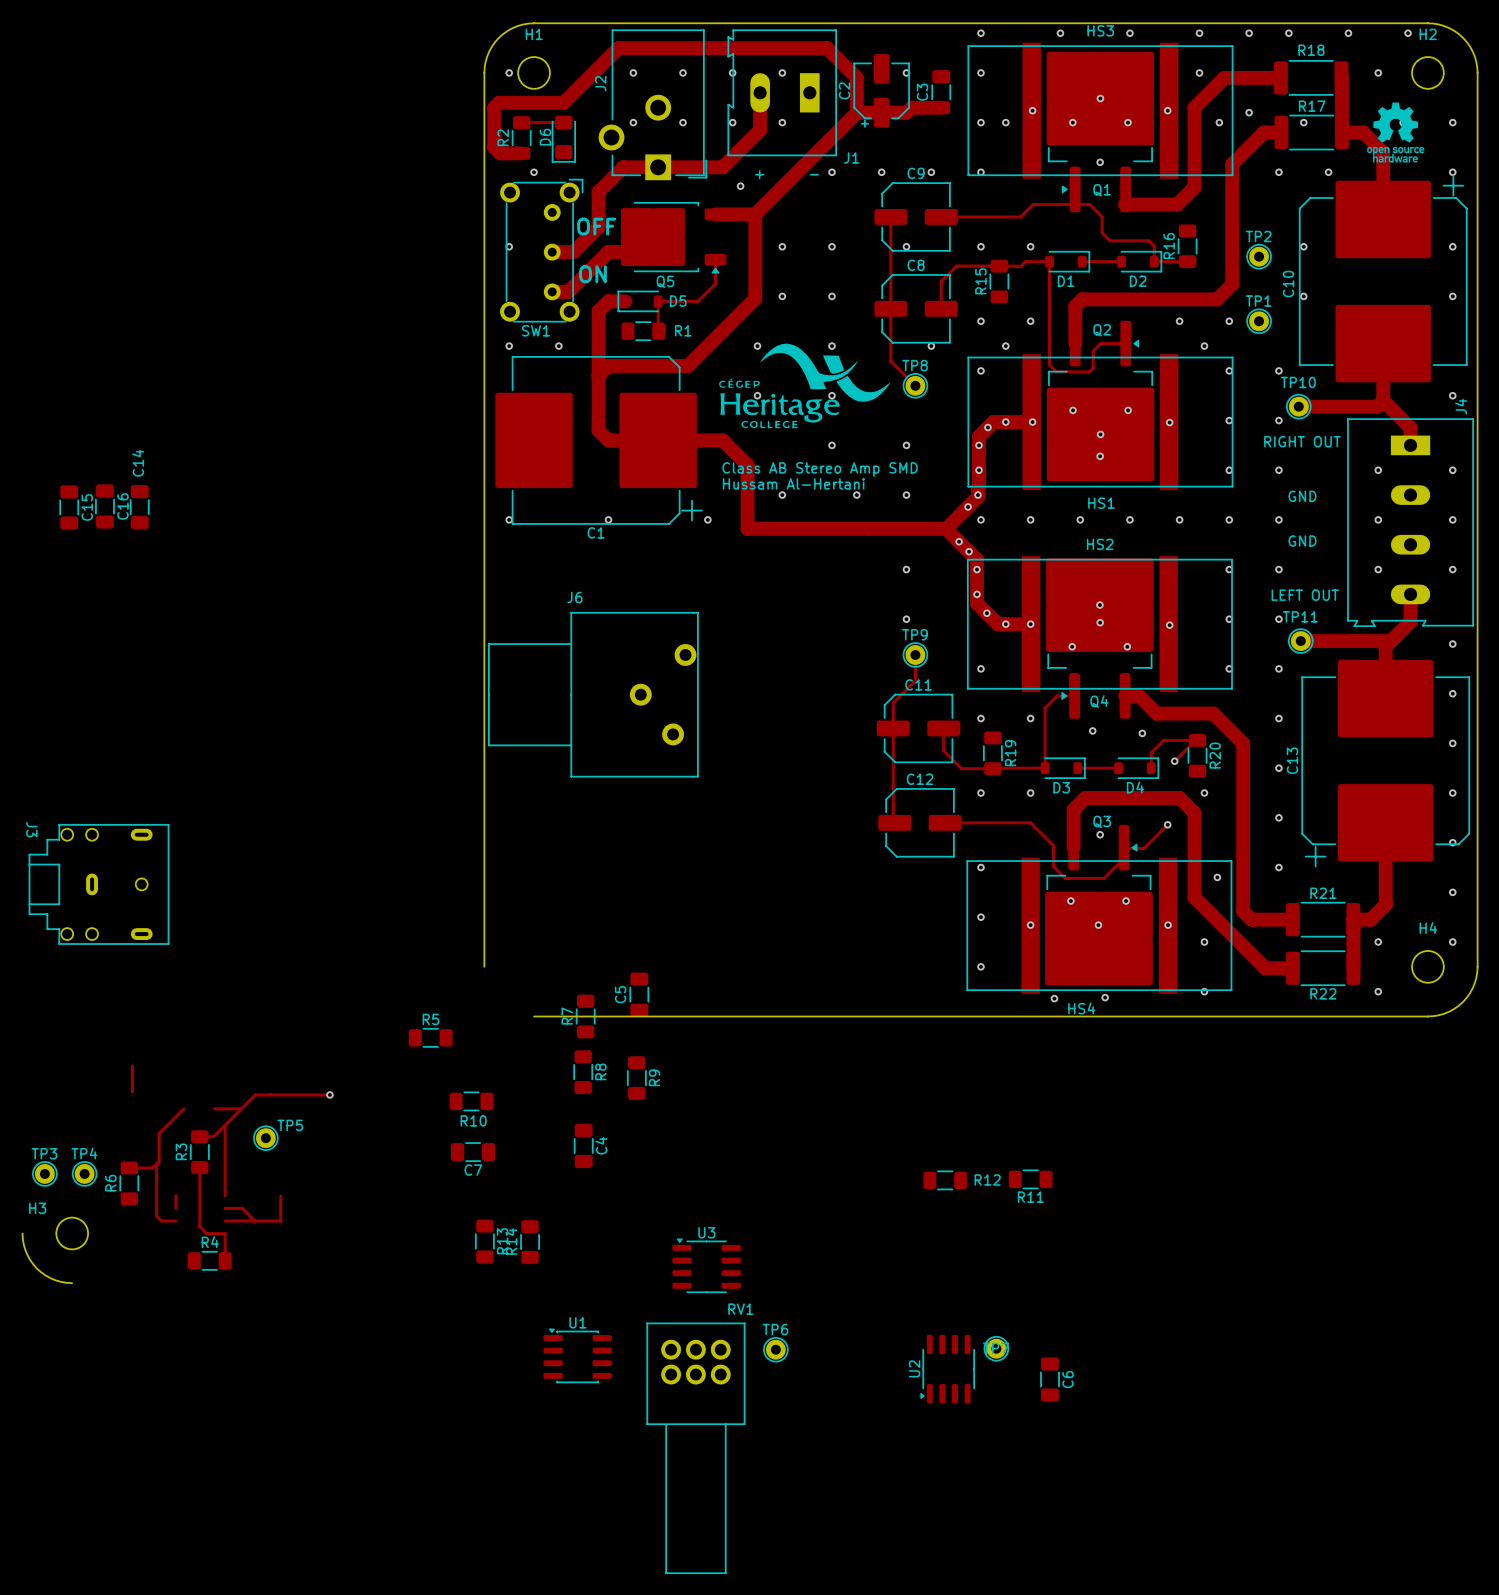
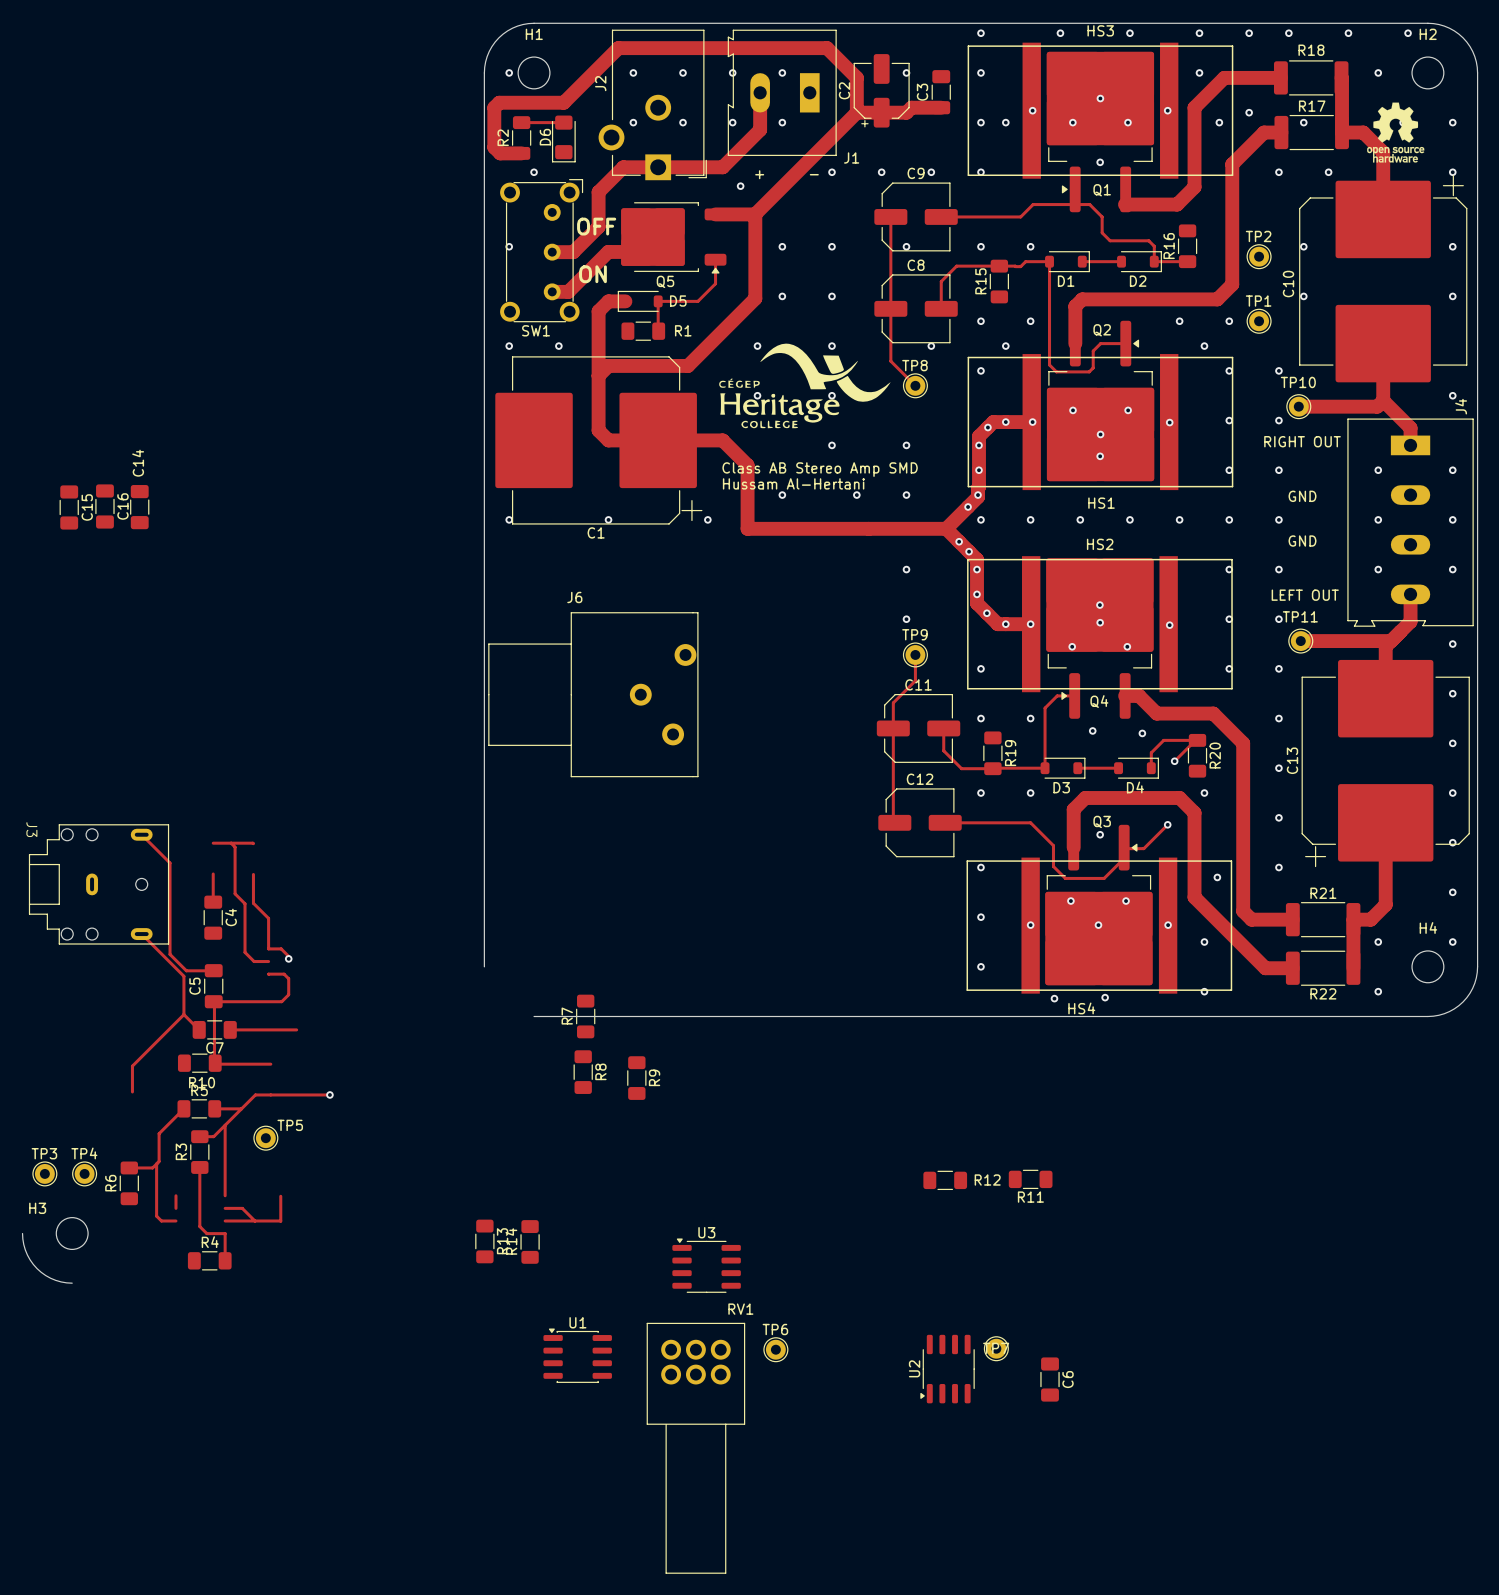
track: none -> (141, 834) (170, 863) (170, 954) (186, 970) (213, 970)
track: none -> (213, 843) (253, 843)
track: none -> (231, 843) (235, 847) (235, 893) (245, 903) (245, 952) (254, 961) (268, 961)
track: none -> (213, 873) (213, 902)
track: none -> (253, 874) (253, 903) (268, 918) (268, 948) (281, 948) (288, 958)
track: none -> (141, 934) (183, 976) (183, 1014)
via: none -> (288, 958)
track: none -> (268, 974) (284, 974) (288, 978) (288, 994) (281, 1001) (213, 1001)
C5 position: (639, 994) -> (213, 986)
track: none -> (214, 1005) (214, 1062) (216, 1064) (270, 1064)
track: none -> (183, 1014) (199, 1029)
track: none -> (183, 1014) (132, 1066)
track: none -> (230, 1029) (296, 1029)
R5 position: (430, 1037) -> (199, 1108)
R10 position: (471, 1101) -> (199, 1063)
C4 position: (583, 1145) -> (213, 917)
C7 position: (473, 1152) -> (214, 1029)

